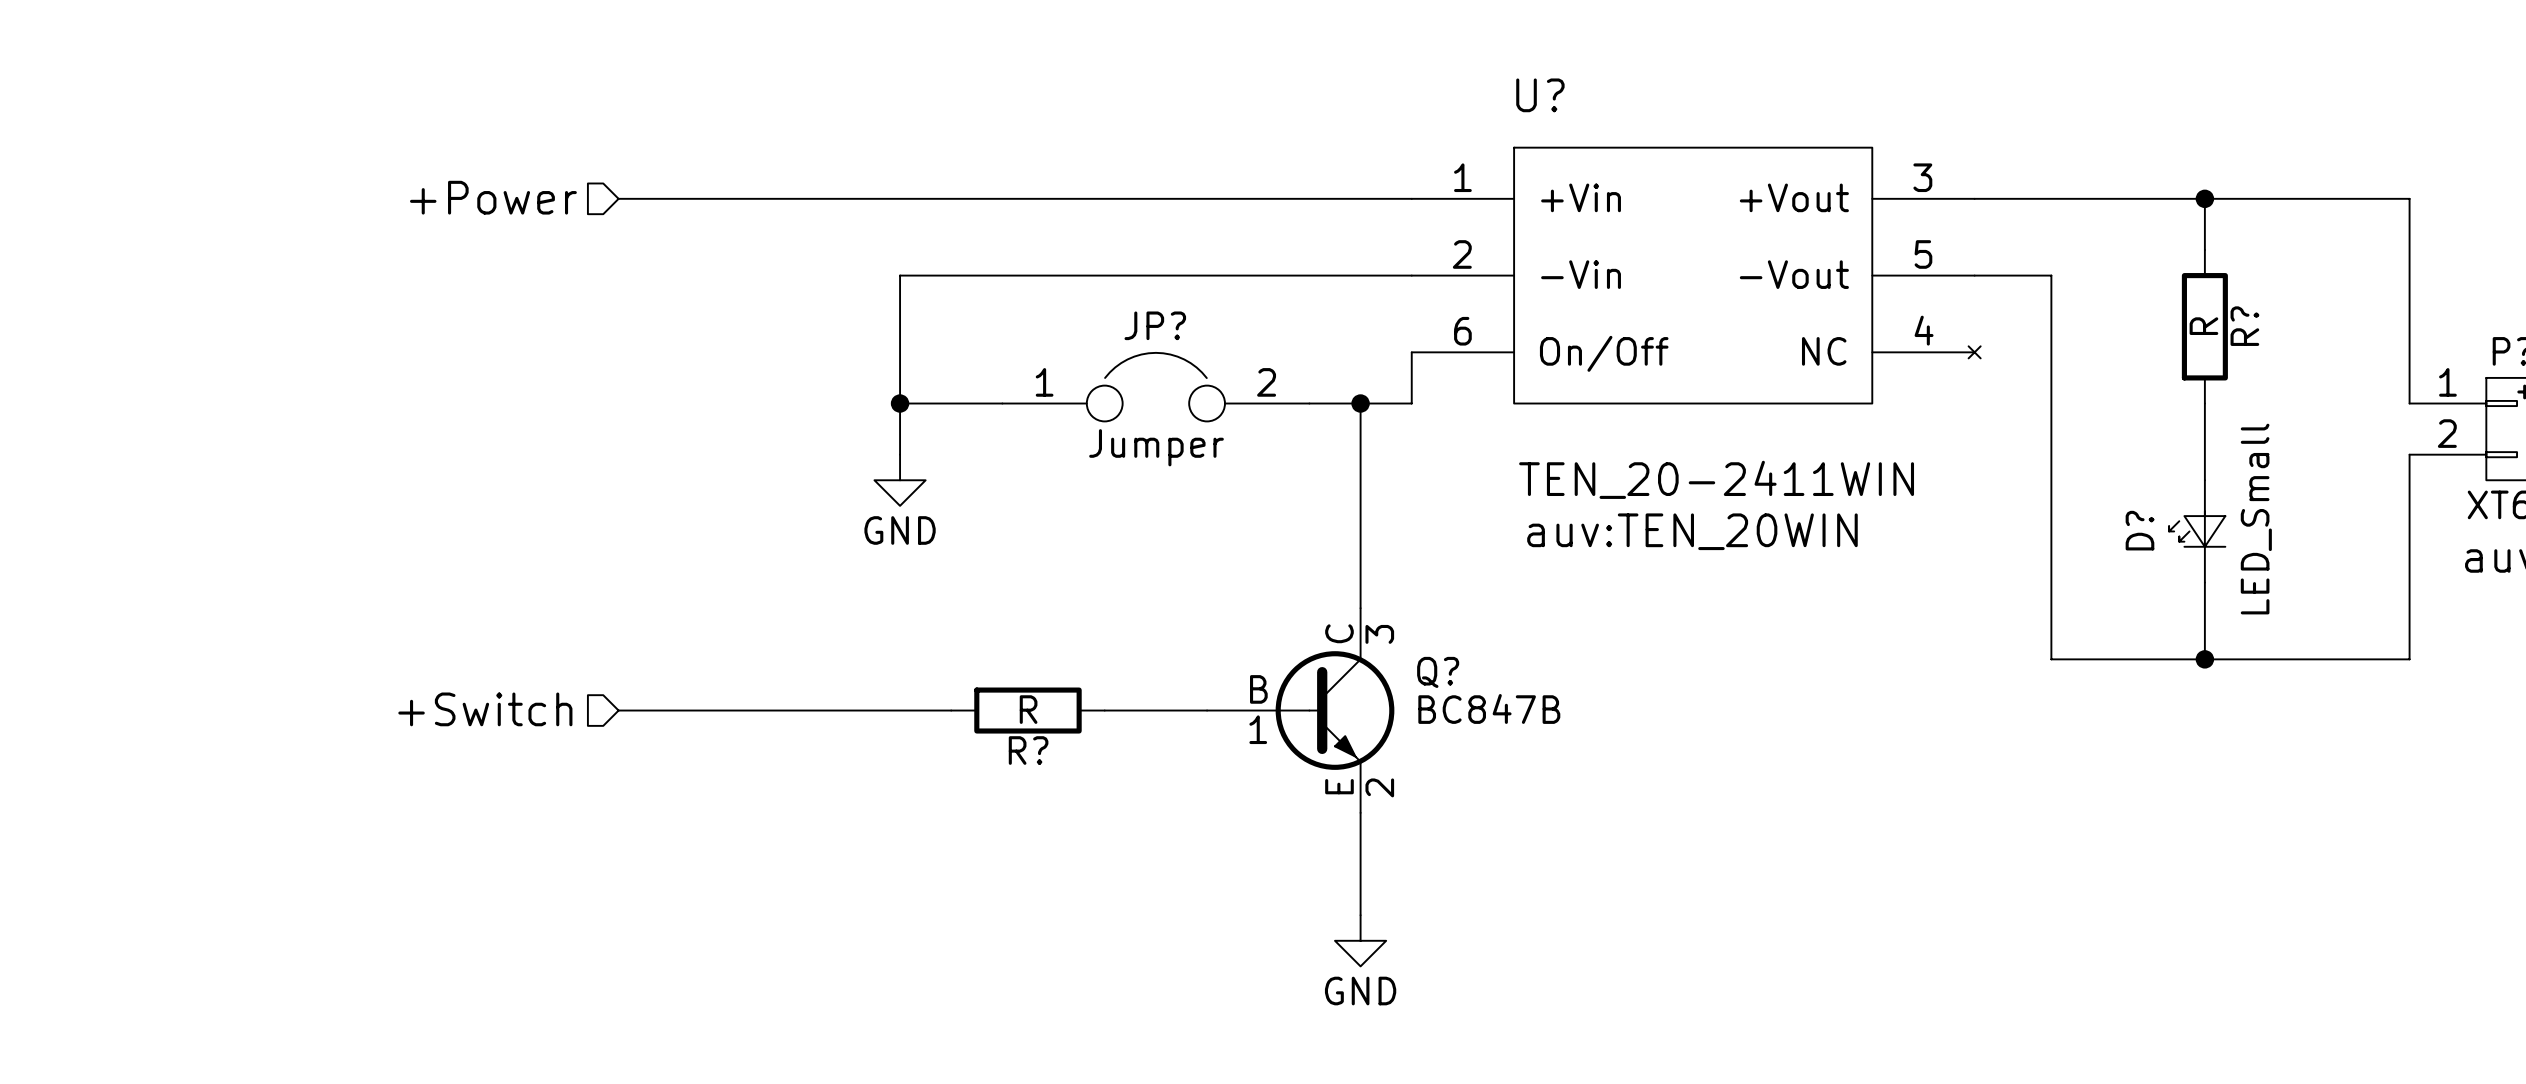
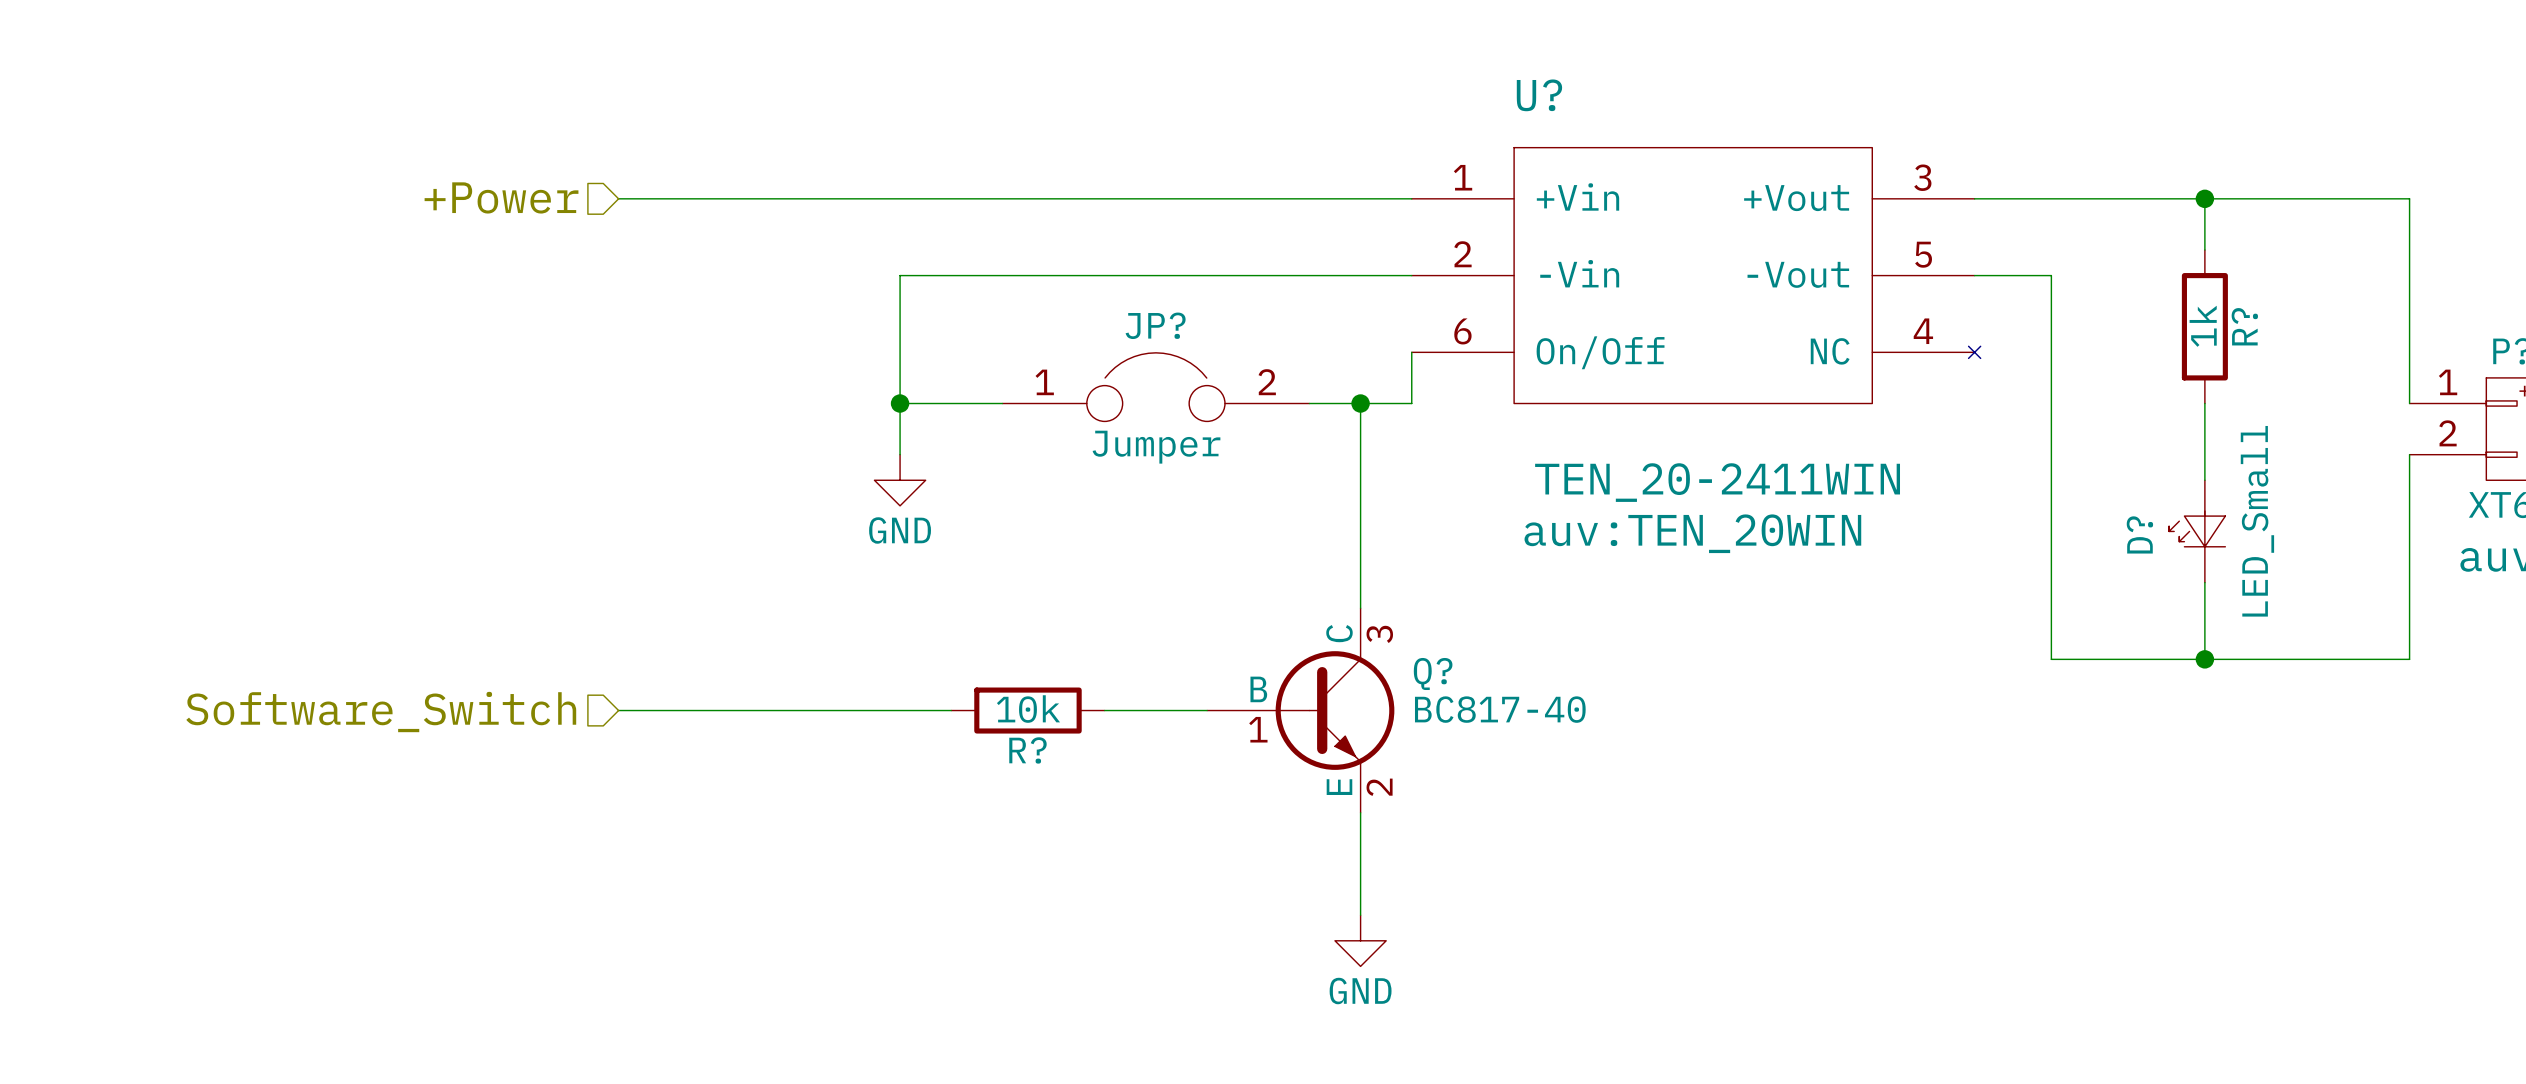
R? value: R (2203, 326) -> 1k (2203, 326)
Q? value: BC847B (1489, 708) -> BC817-40 (1500, 709)
hierarchical label: +Switch (485, 709) -> Software_Switch (381, 712)
R? value: R (1028, 709) -> 10k (1028, 709)

